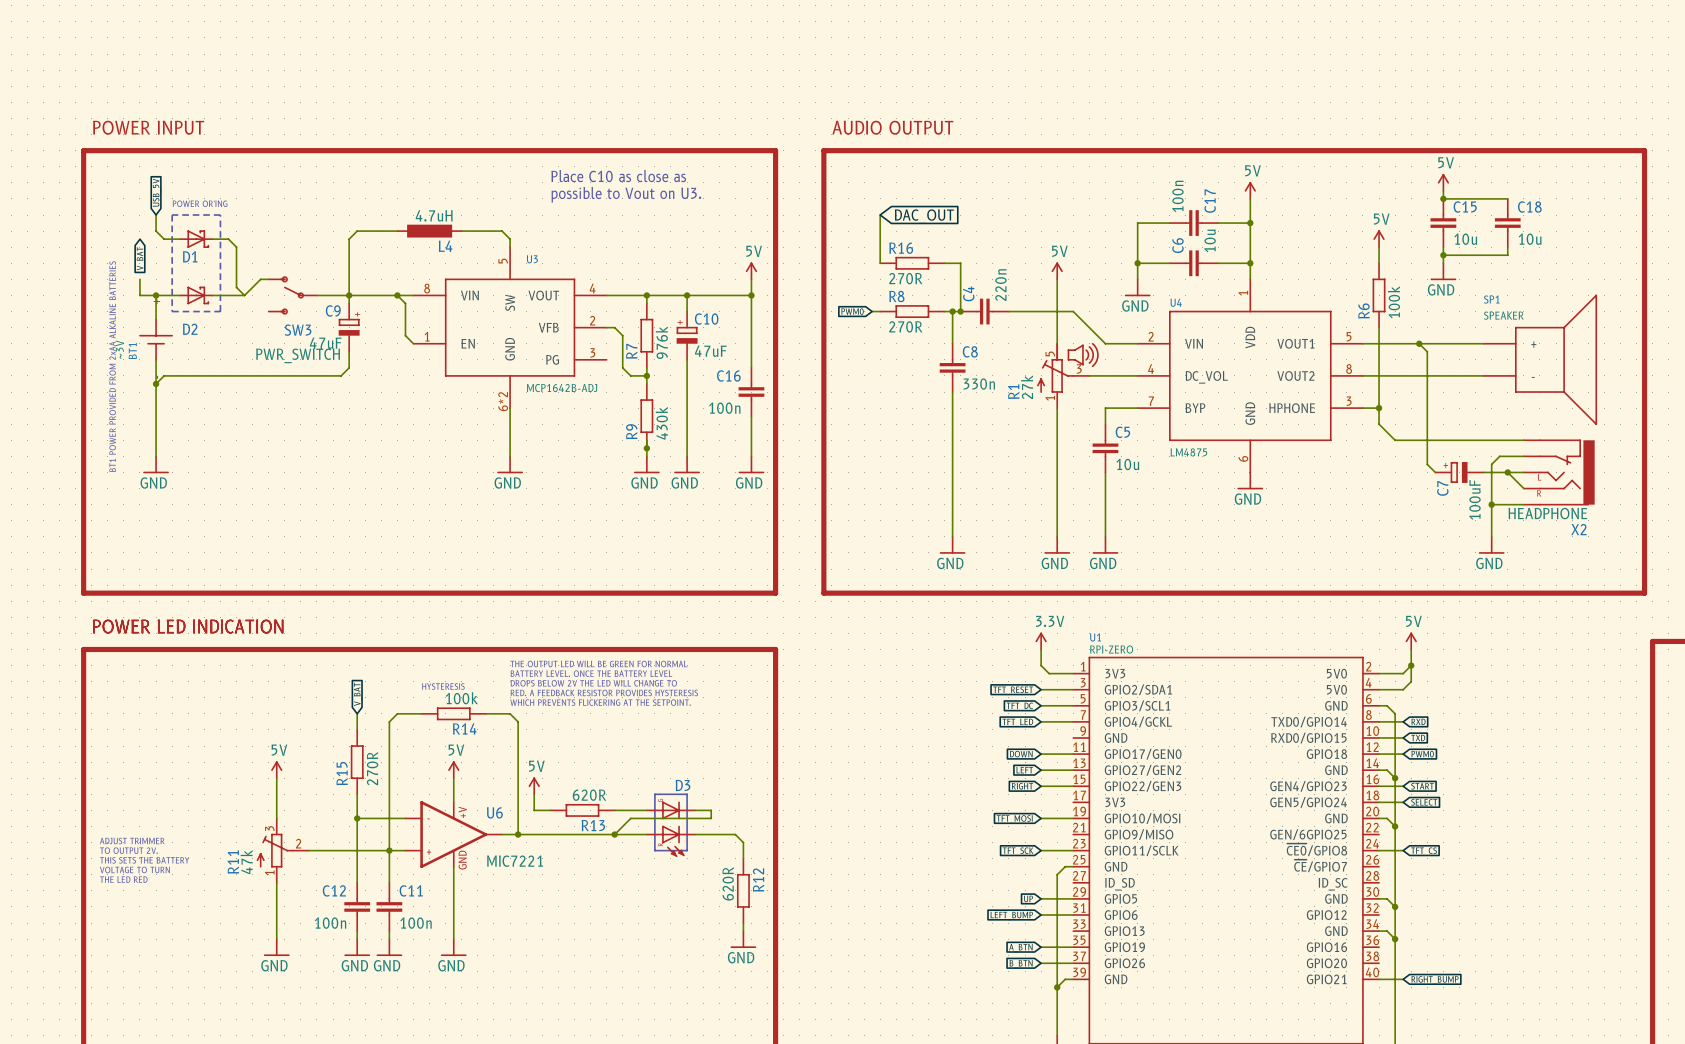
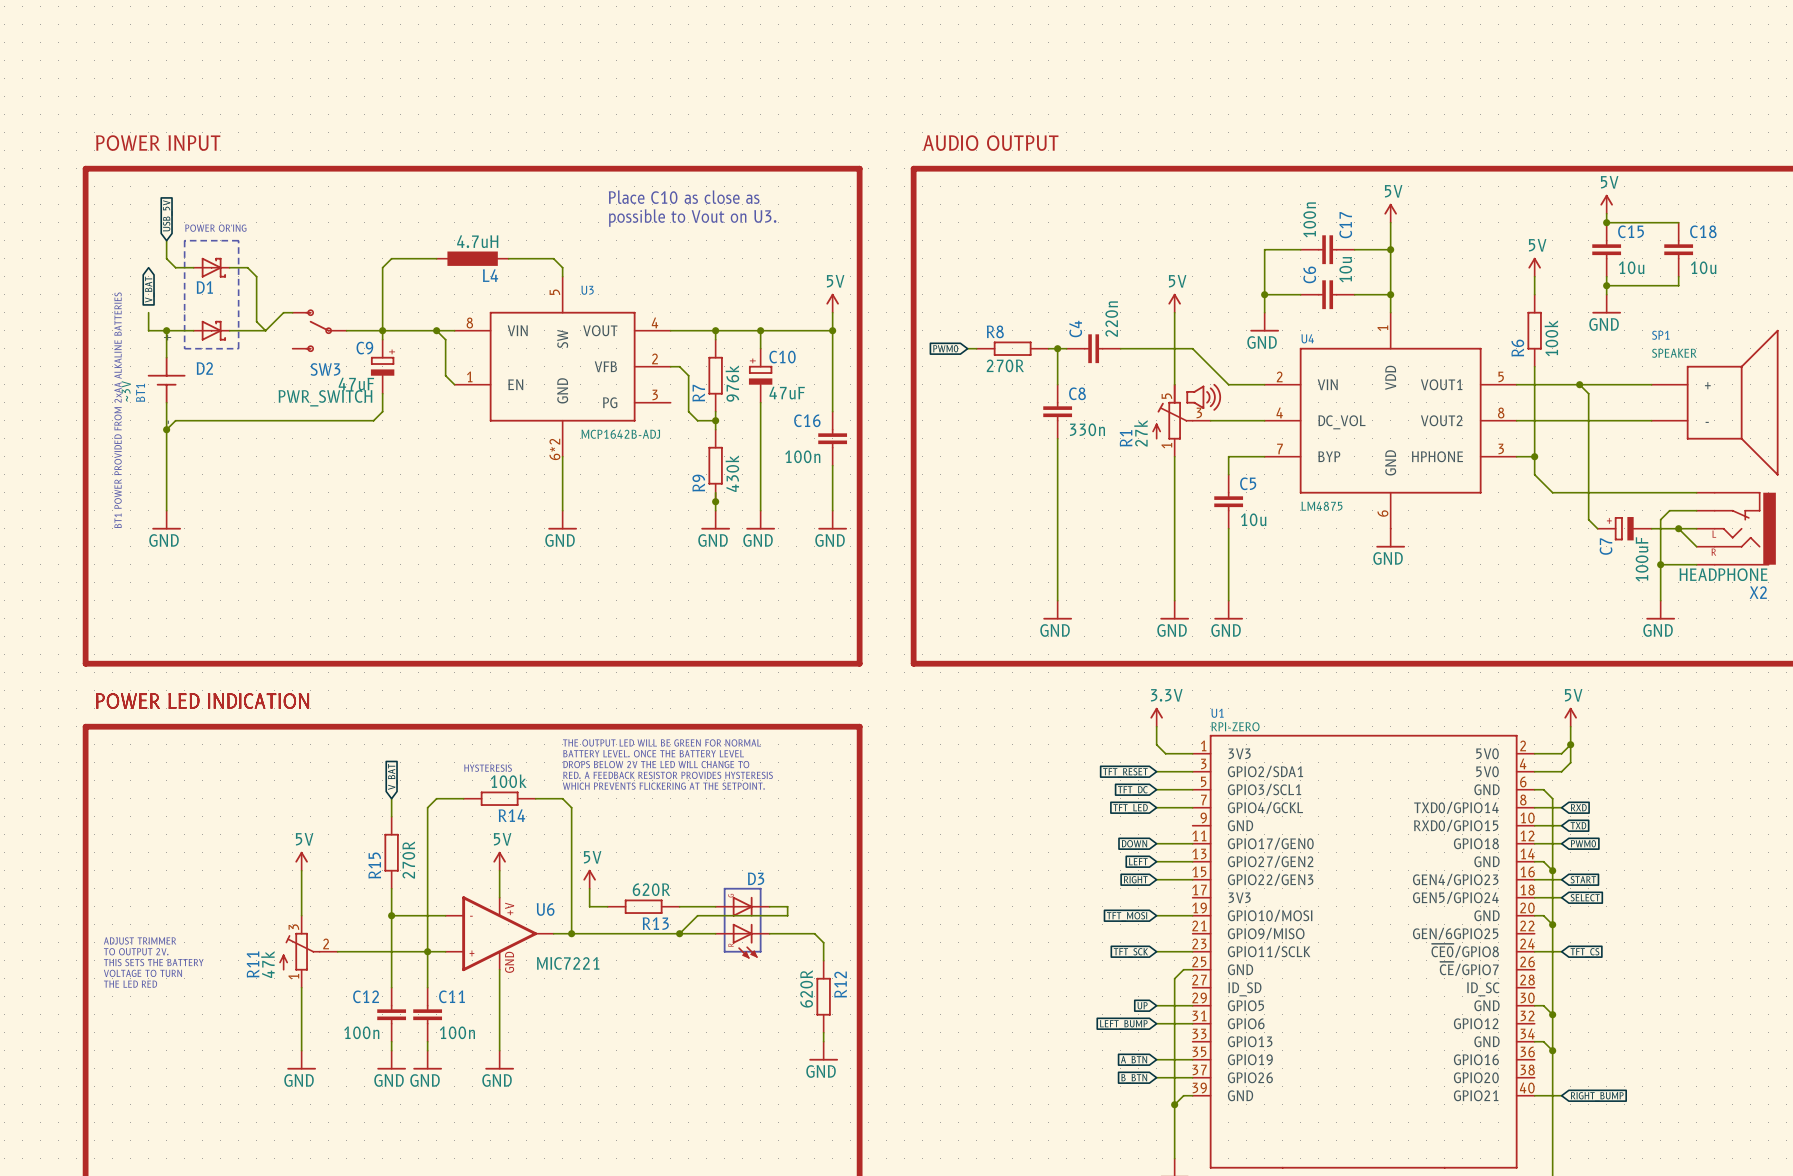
wire: (880, 215) (880, 263) -> none
global label: DAC_OUT (924, 216) -> none
R16: 270R (912, 263) -> none
wire: (944, 263) (960, 263) (960, 311) -> none
junction: (960, 311) -> none

